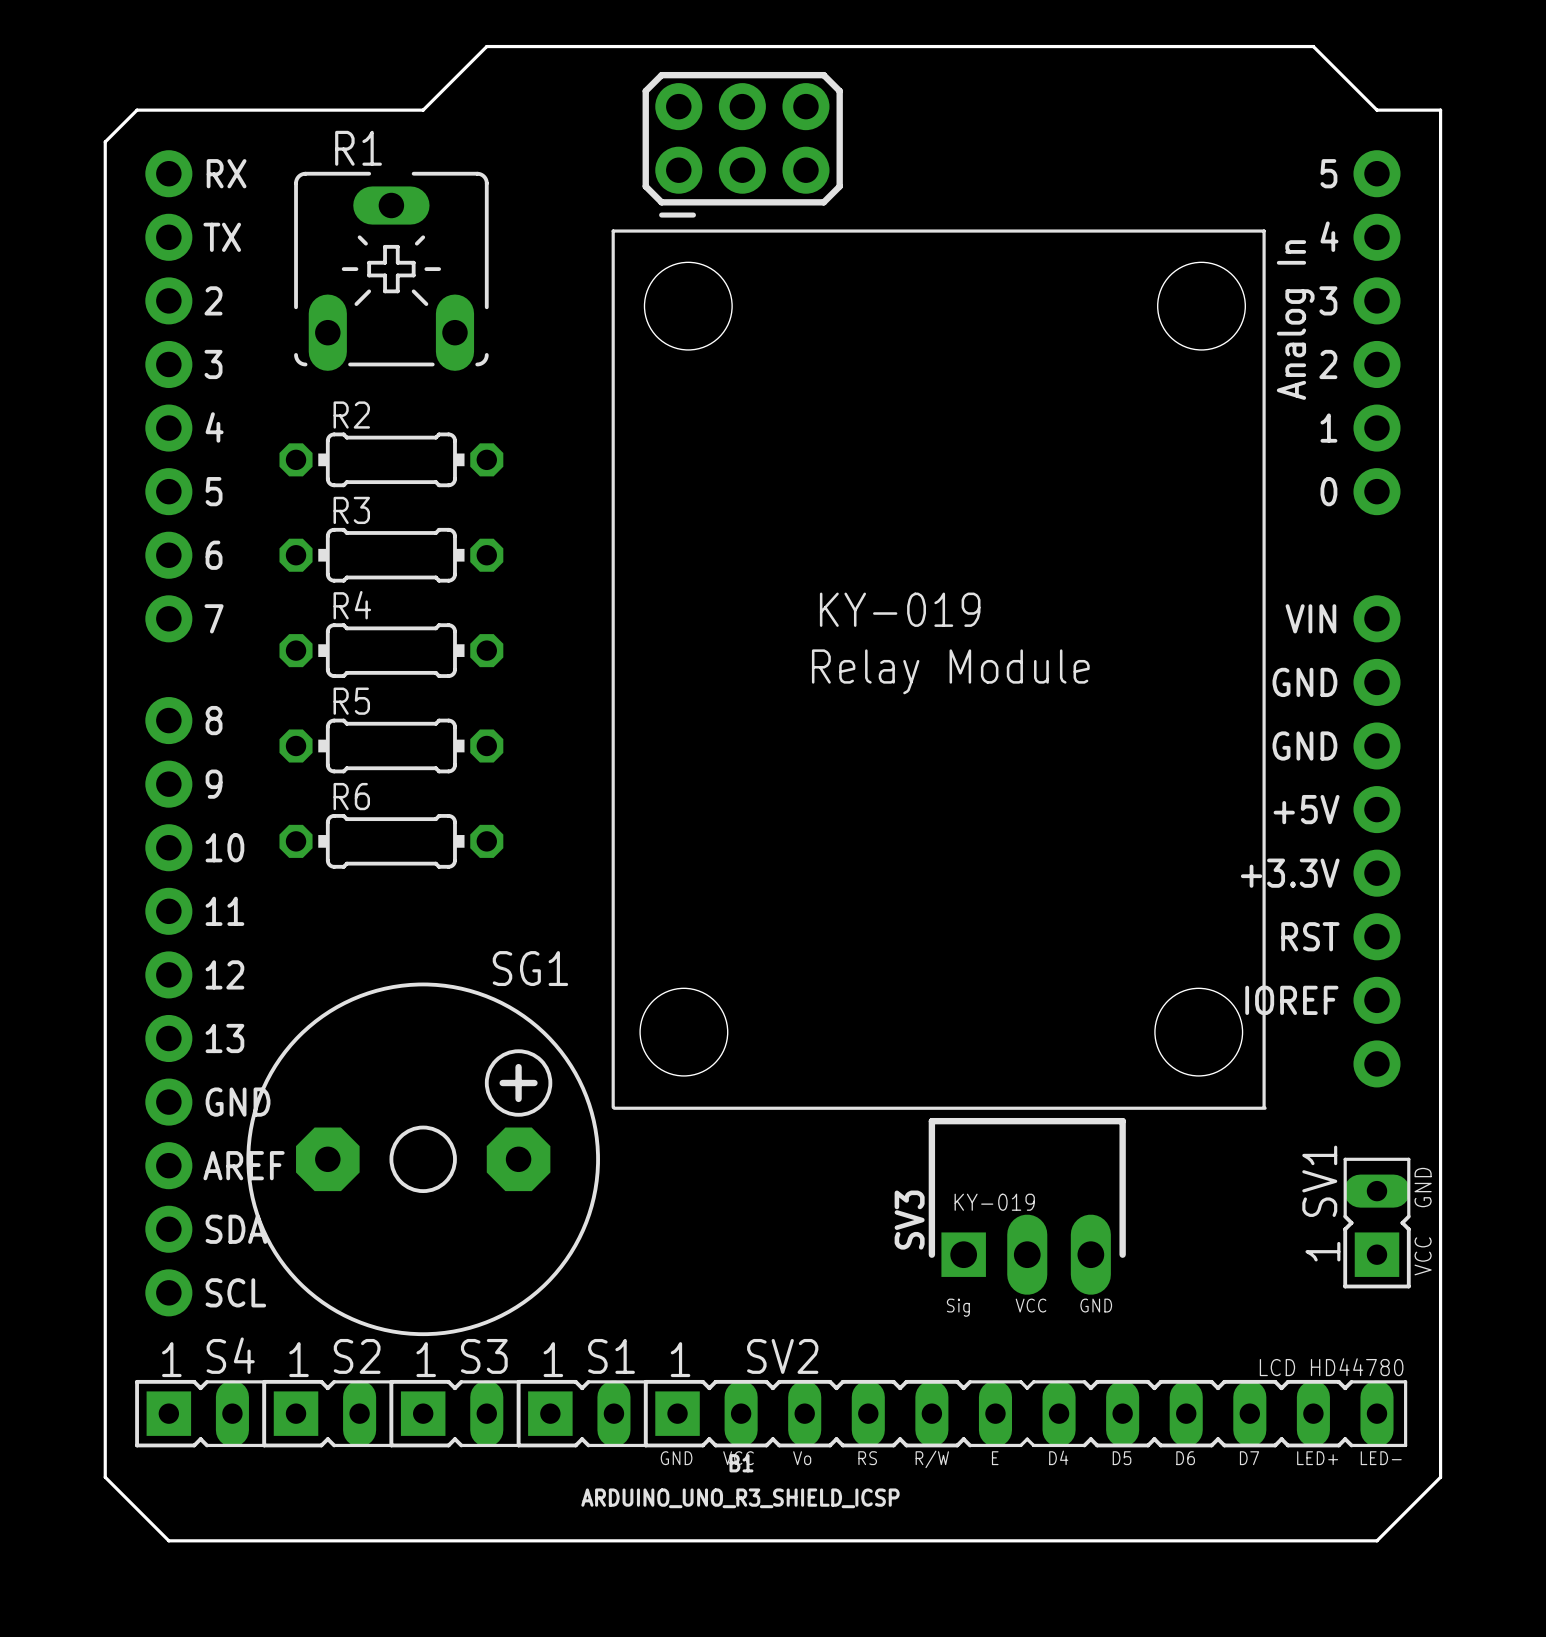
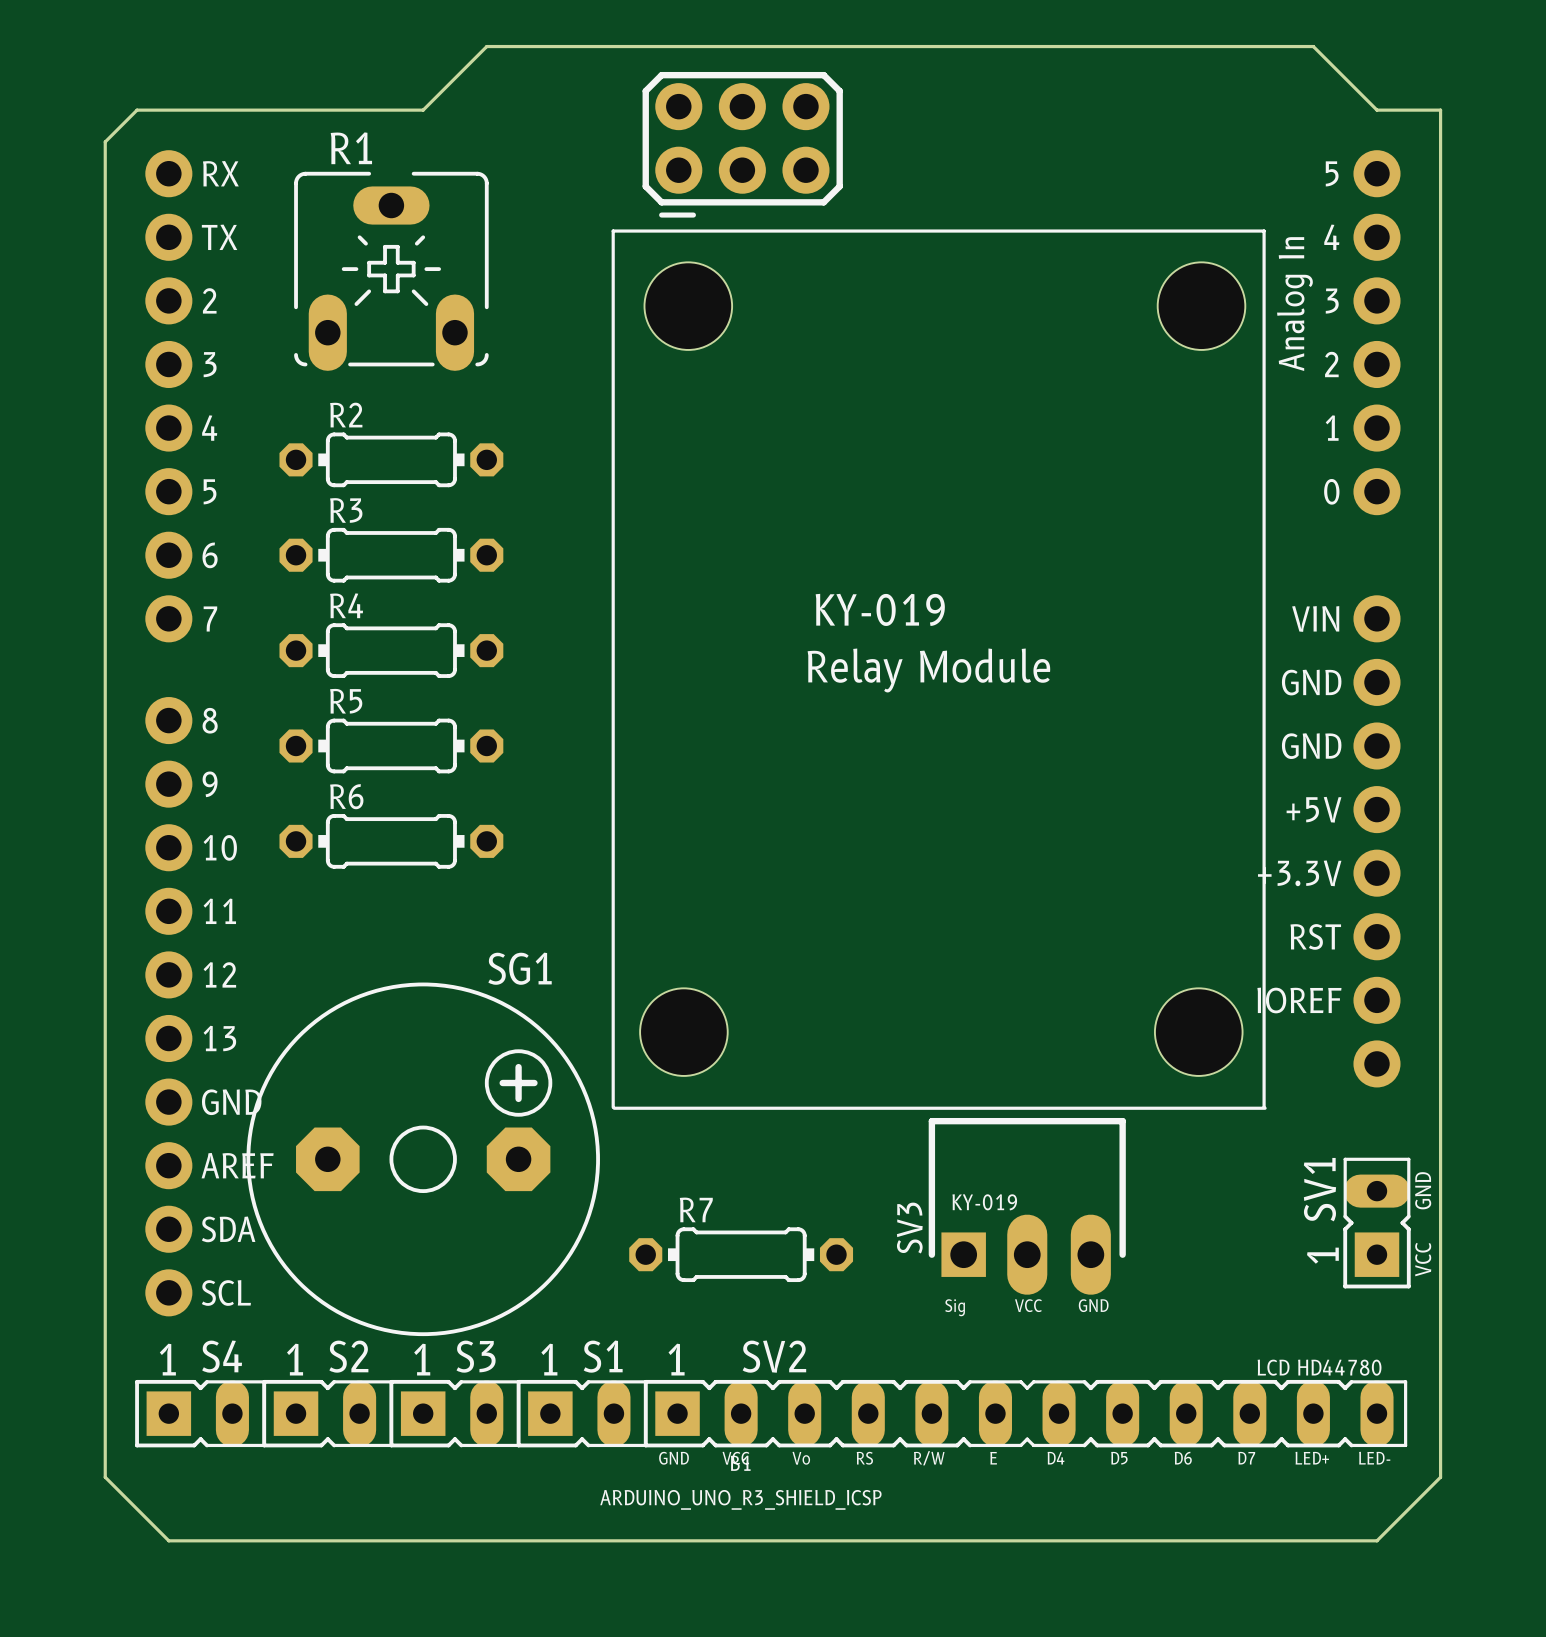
R7: none -> (741, 1254)

